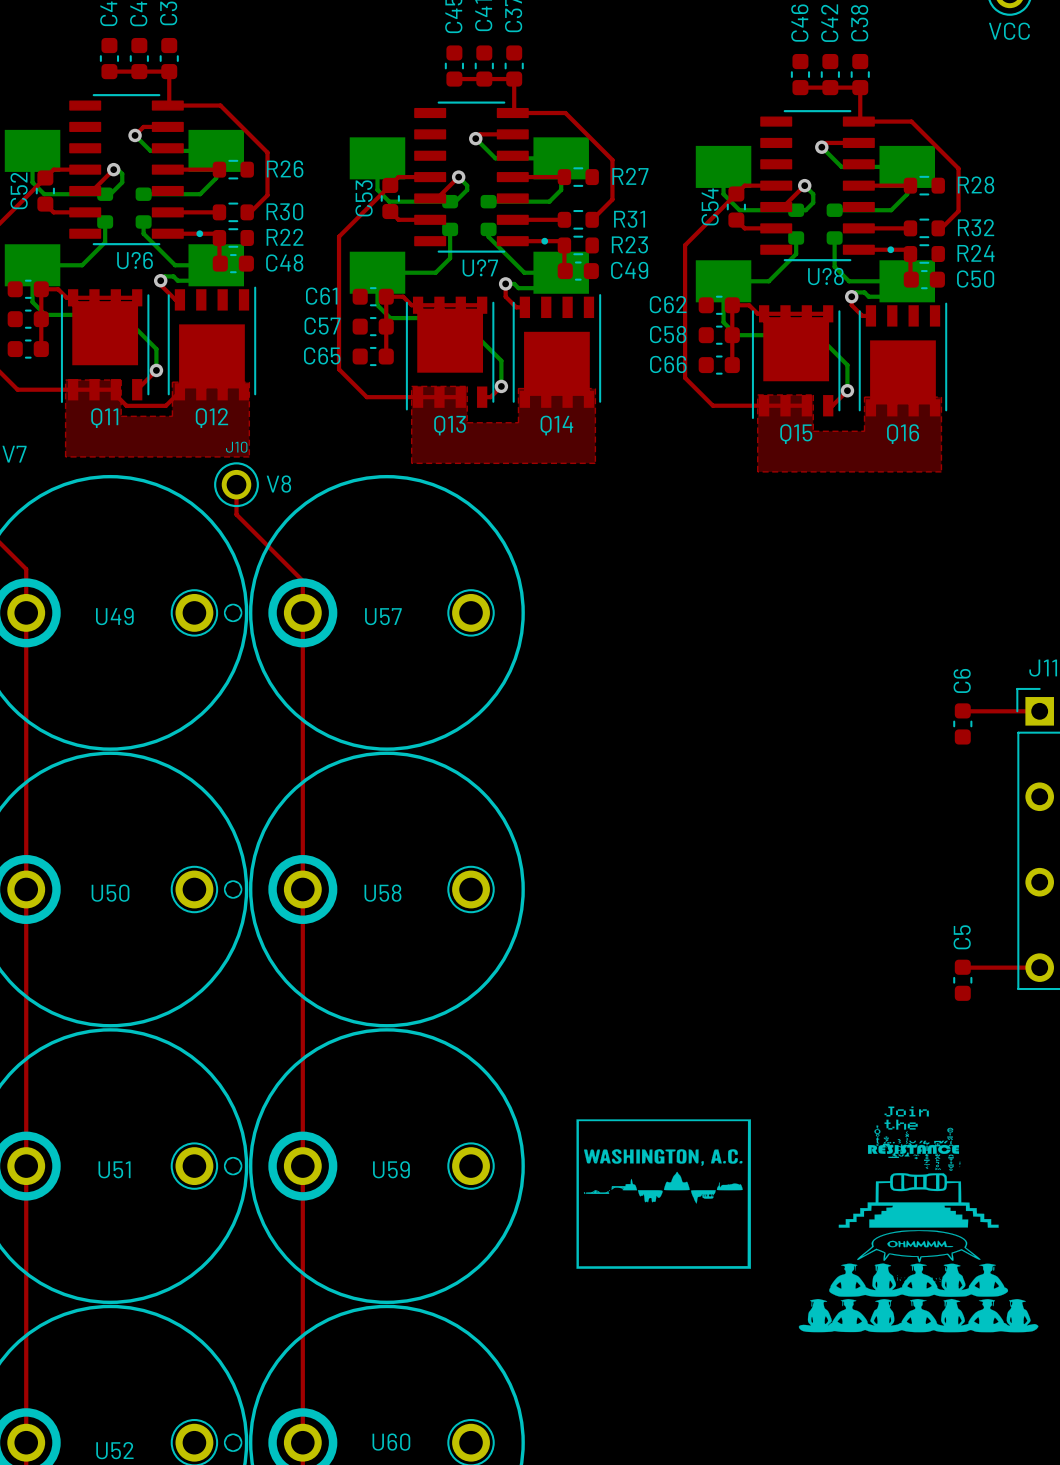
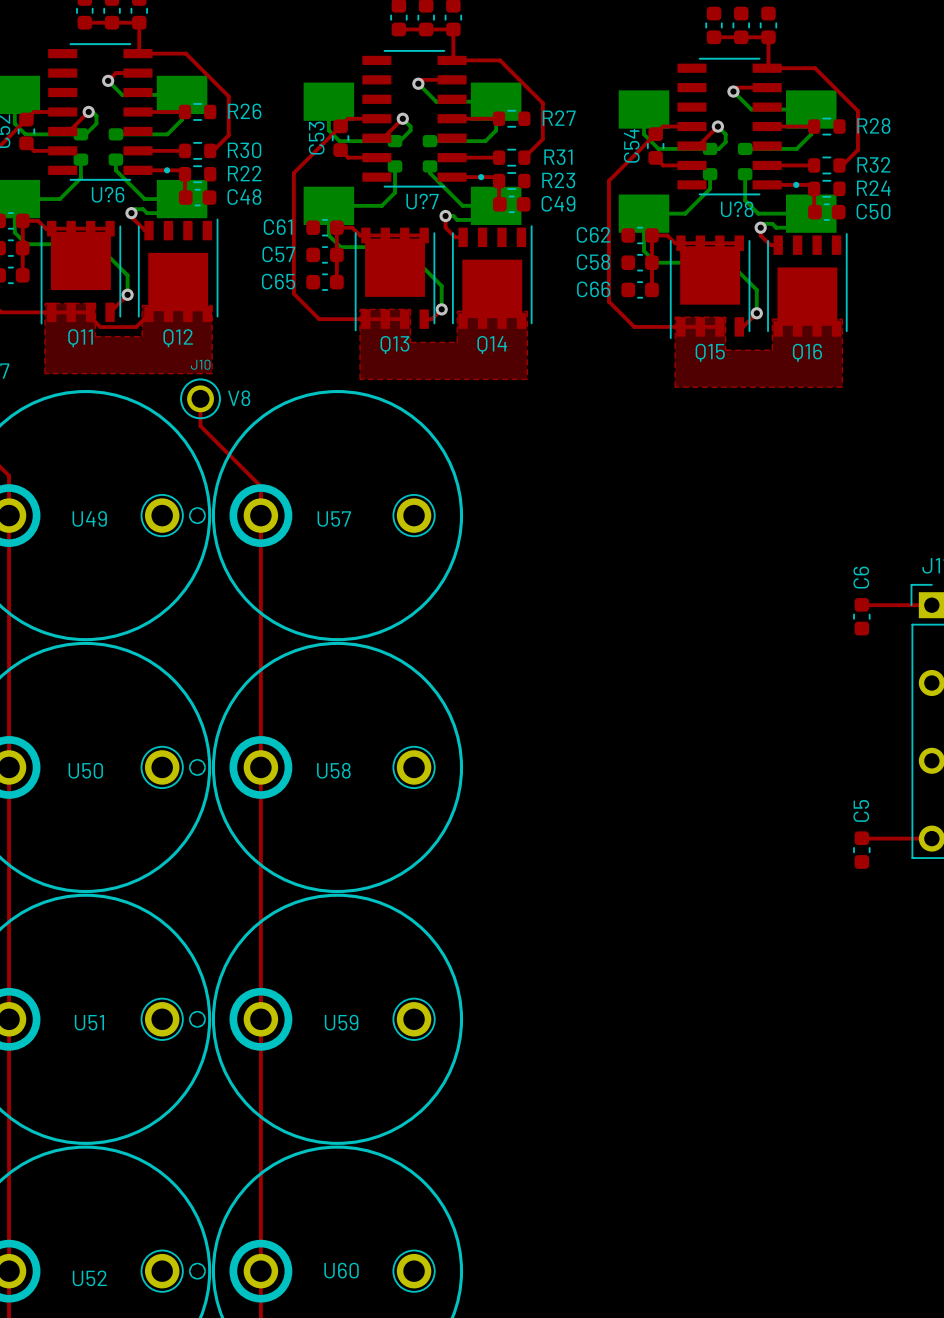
drawing: [798, 1106, 1039, 1333] -> none
drawing: [576, 1119, 751, 1269] -> none

